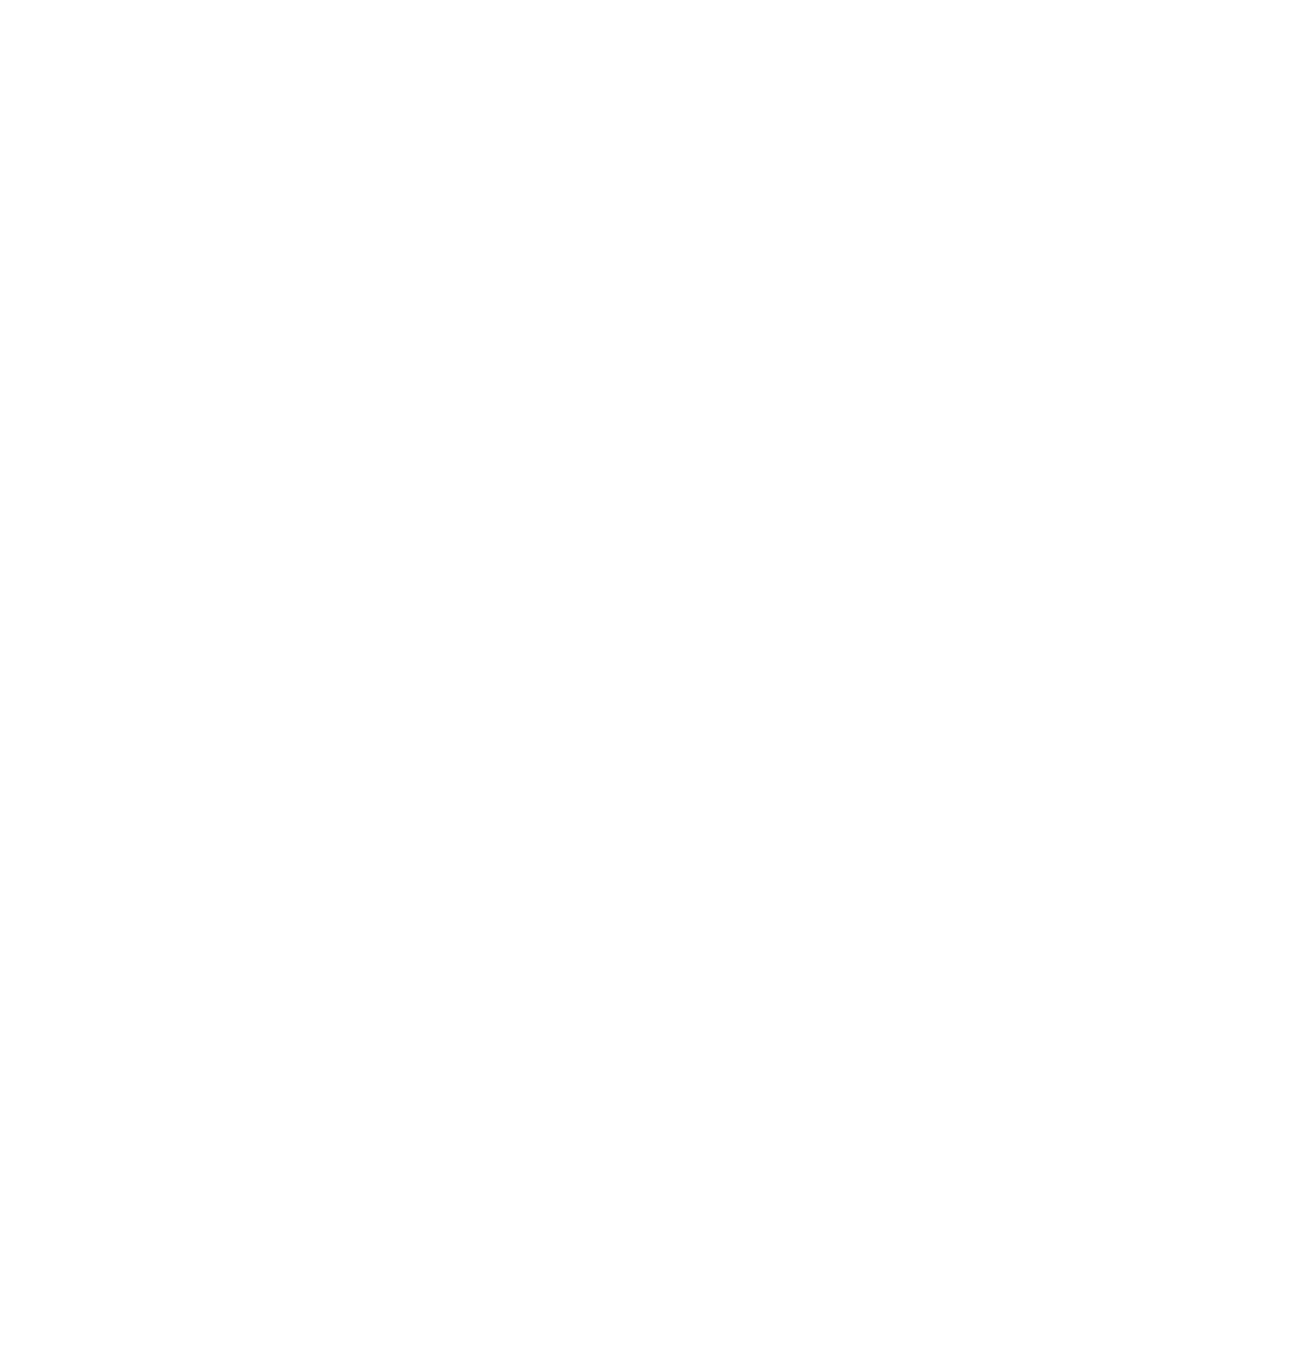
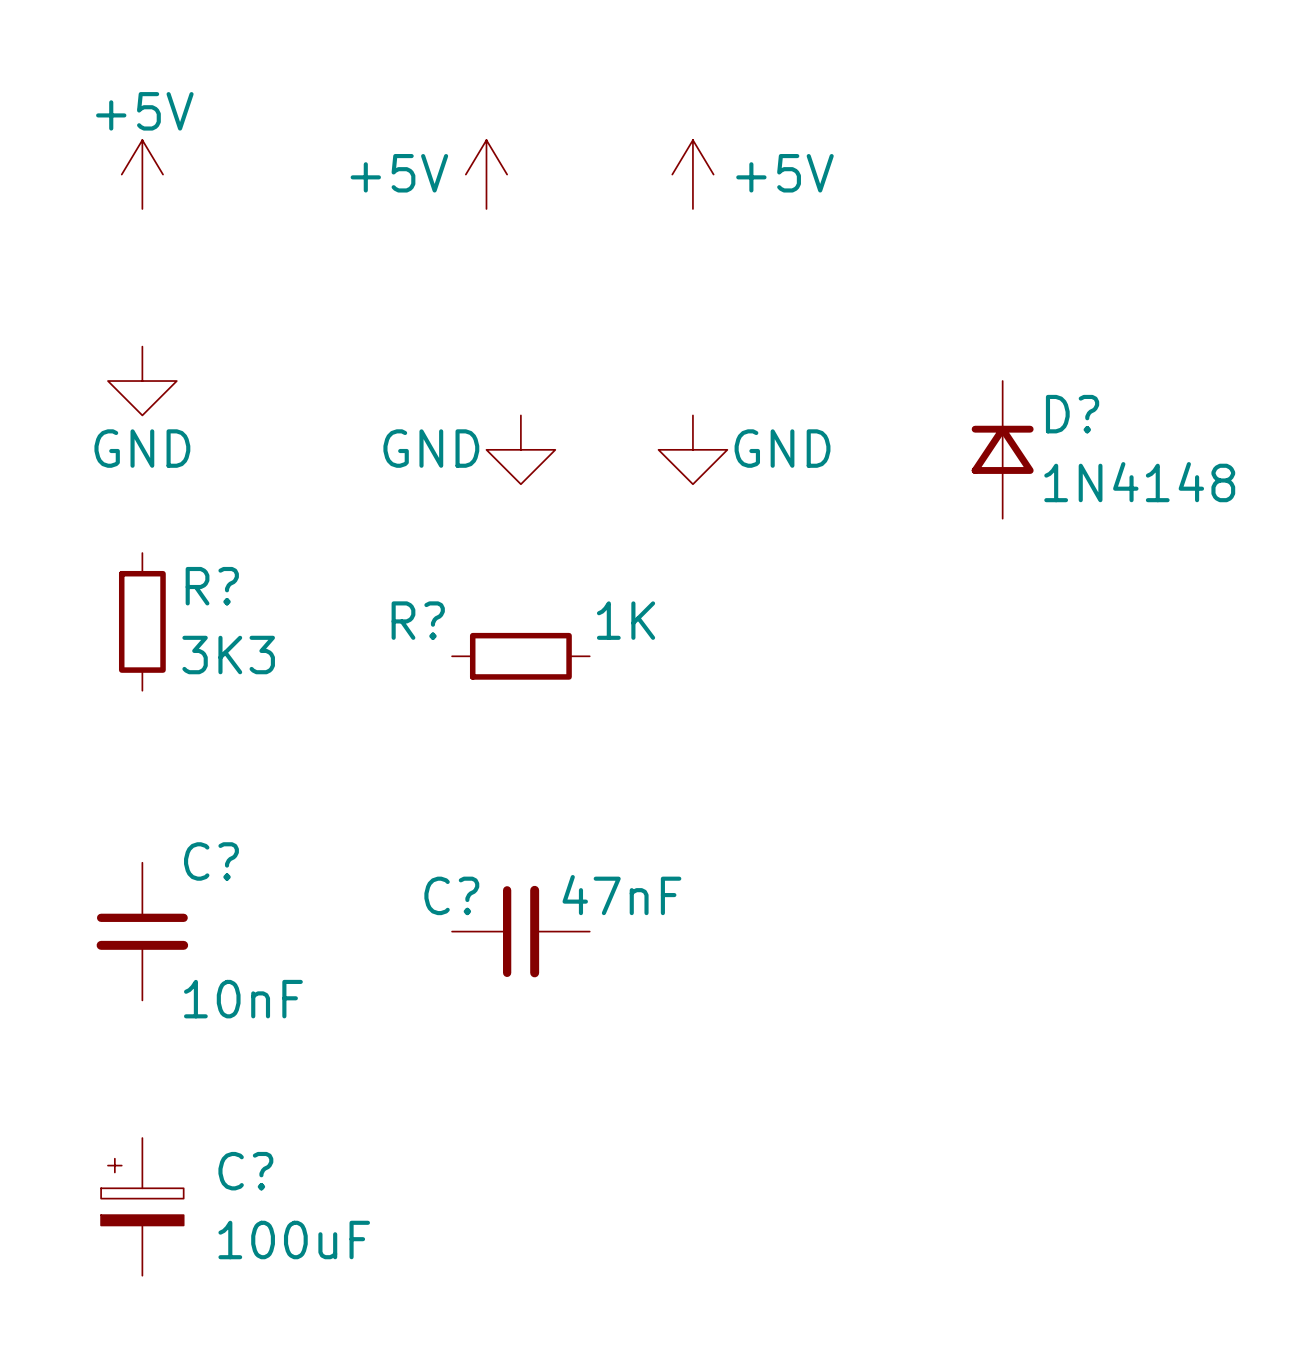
power symbol: none -> +5V (142, 174)
power symbol: none -> +5V (486, 174)
power symbol: none -> +5V (692, 174)
power symbol: none -> GND (142, 381)
power symbol: none -> GND (520, 449)
power symbol: none -> GND (692, 449)
D?: none -> 1N4148 (1002, 449)
R?: none -> 3K3 (142, 621)
R?: none -> 1K (520, 656)
C?: none -> 10nF (142, 931)
C?: none -> 47nF (520, 931)
C?: none -> 100uF (142, 1206)

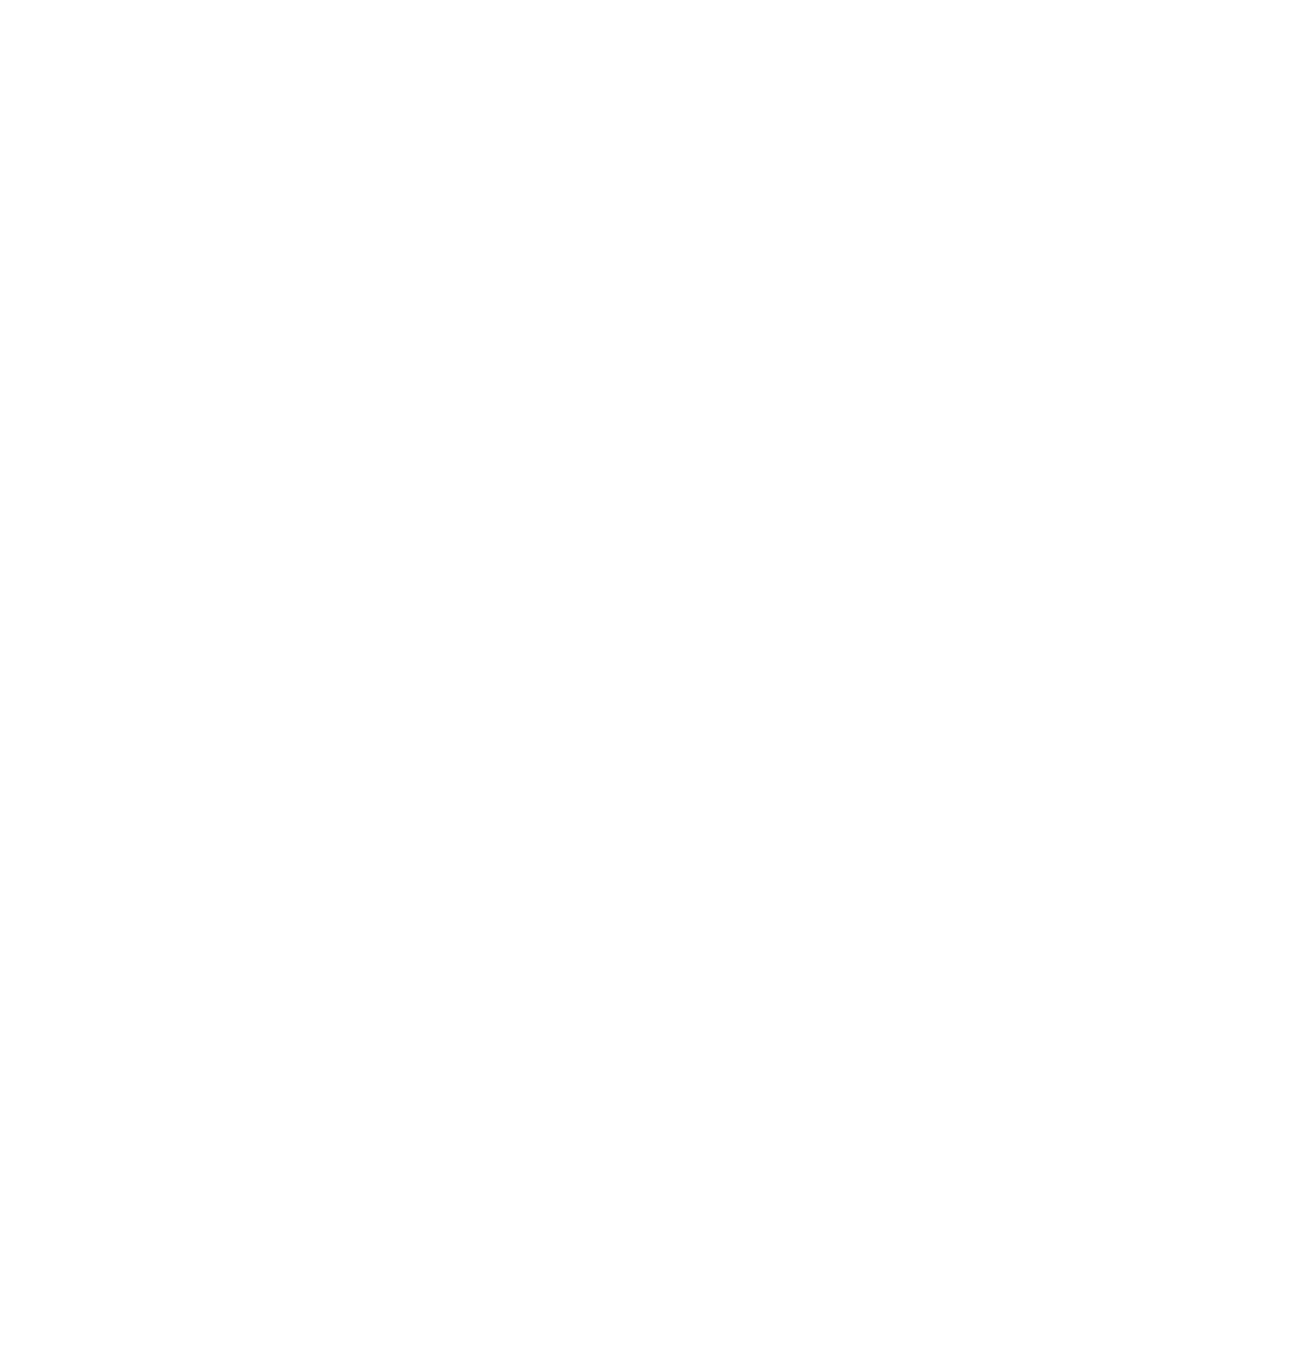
power symbol: +5V (142, 174) -> none
power symbol: +5V (486, 174) -> none
power symbol: +5V (692, 174) -> none
power symbol: GND (142, 381) -> none
power symbol: GND (520, 449) -> none
power symbol: GND (692, 449) -> none
D?: 1N4148 (1002, 449) -> none
R?: 3K3 (142, 621) -> none
R?: 1K (520, 656) -> none
C?: 10nF (142, 931) -> none
C?: 47nF (520, 931) -> none
C?: 100uF (142, 1206) -> none

